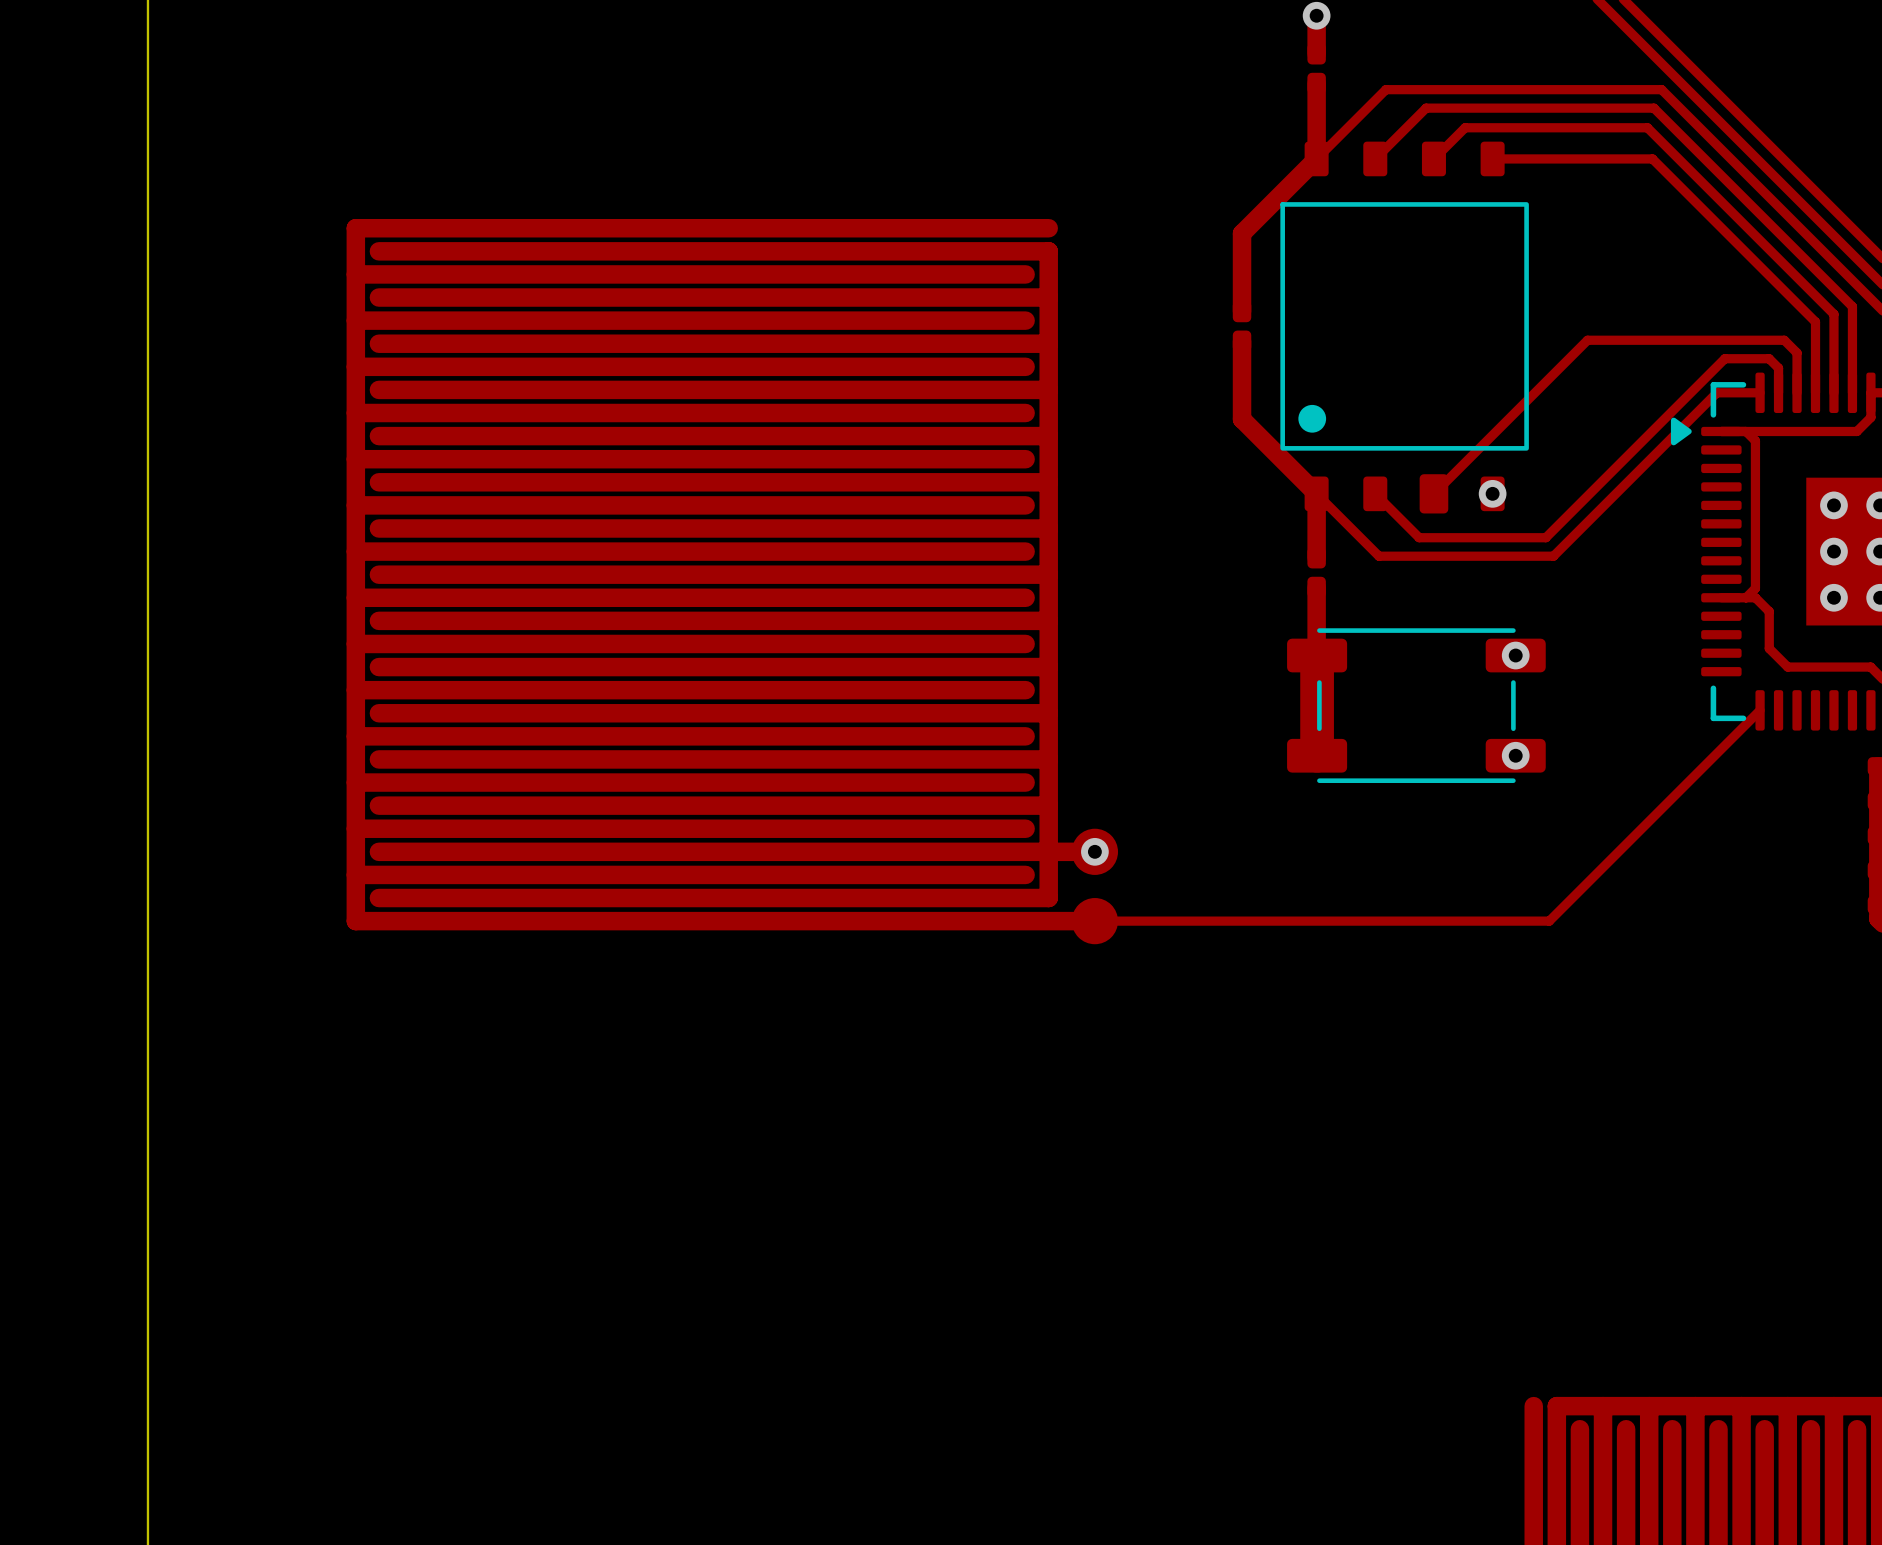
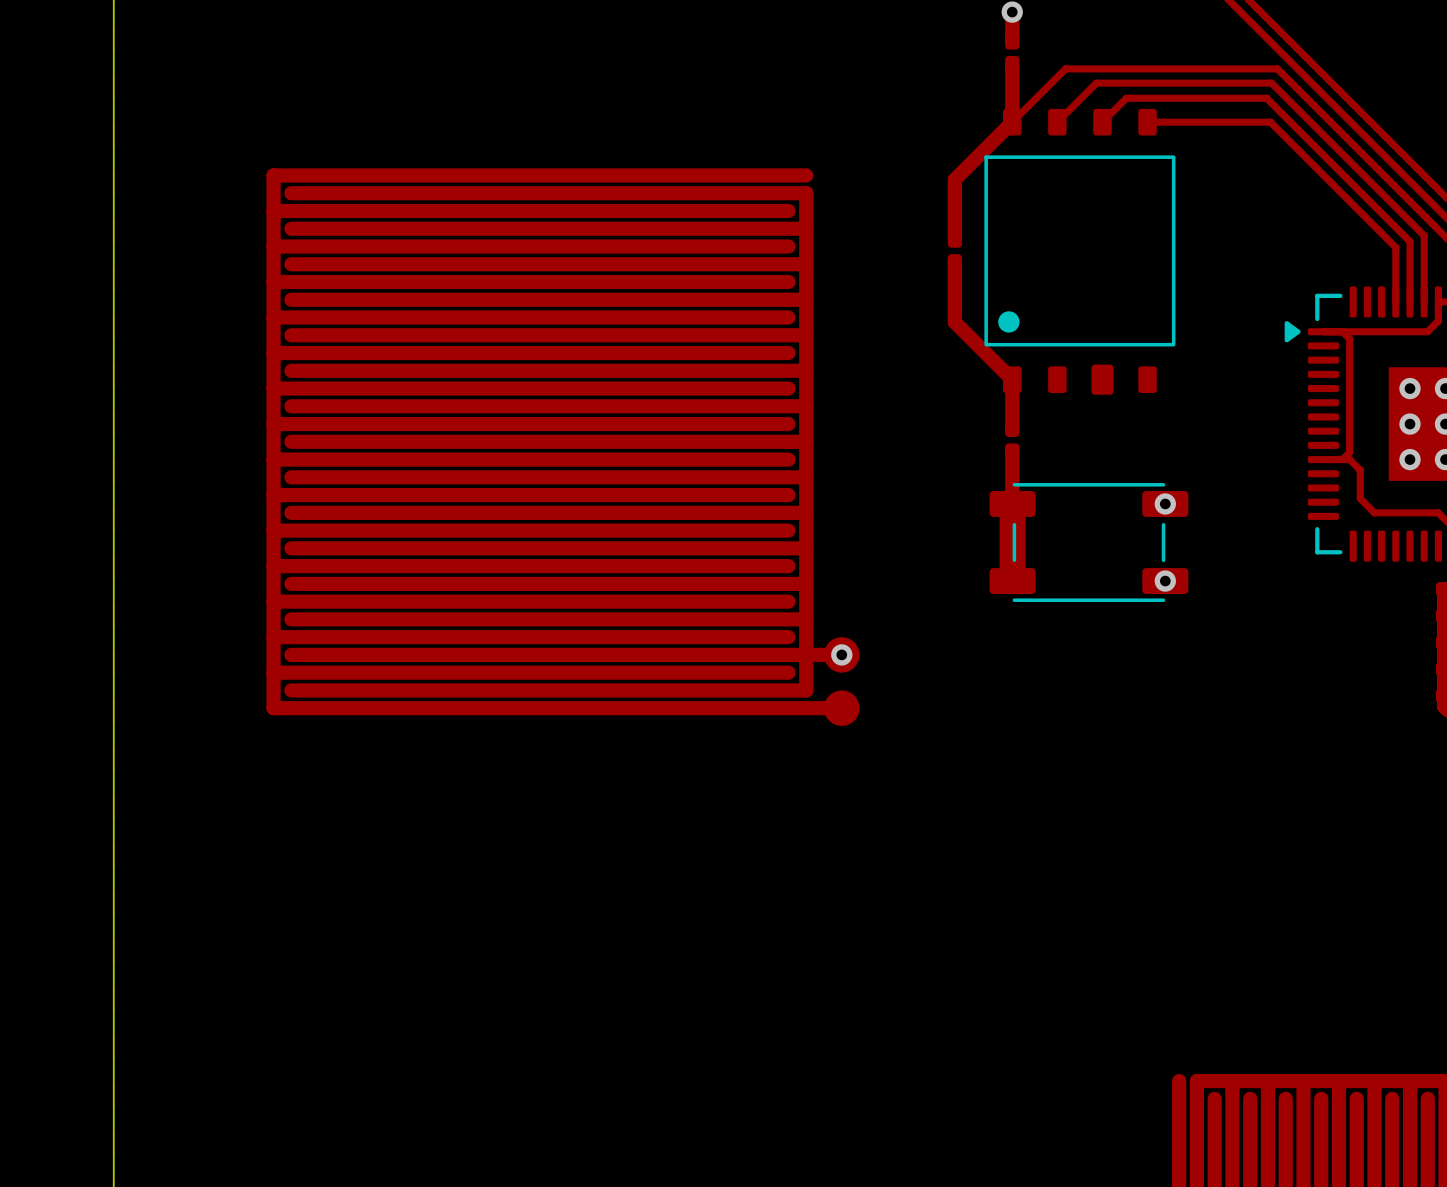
part footprint: [346, 219, 1119, 945] -> [266, 168, 860, 726]
top track: (1760, 392) (1716, 392) (1553, 556) (1378, 556) (1316, 493) -> none
top track: (1778, 392) (1778, 368) (1769, 358) (1724, 358) (1545, 537) (1419, 537) (1375, 493) -> none
top track: (1797, 392) (1797, 352) (1784, 340) (1587, 340) (1433, 493) -> none
via: (1492, 493) -> none
top track: (1760, 710) (1549, 921) (1097, 921) -> none

